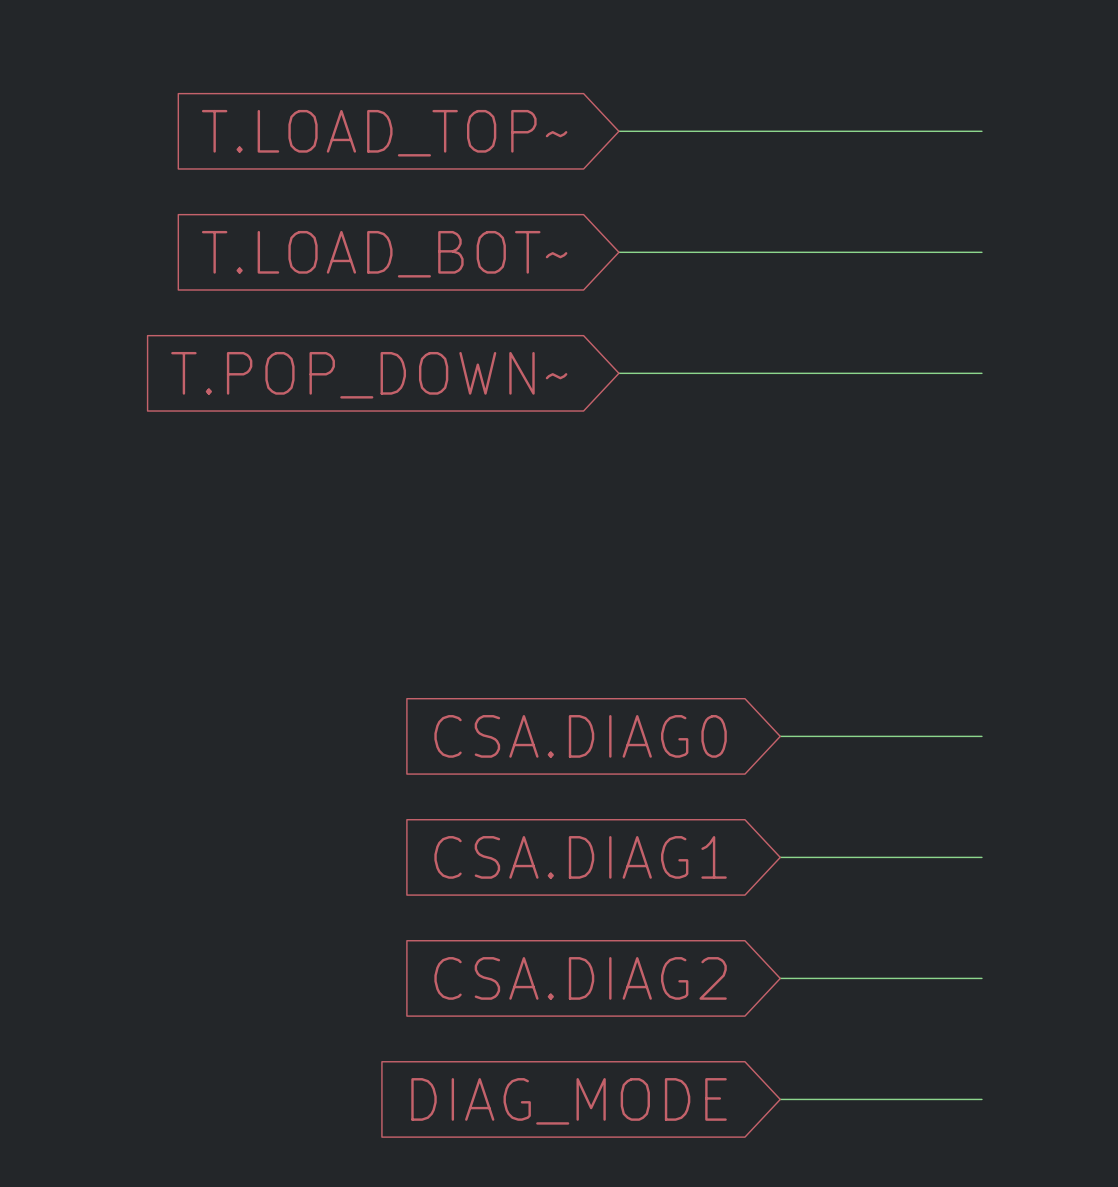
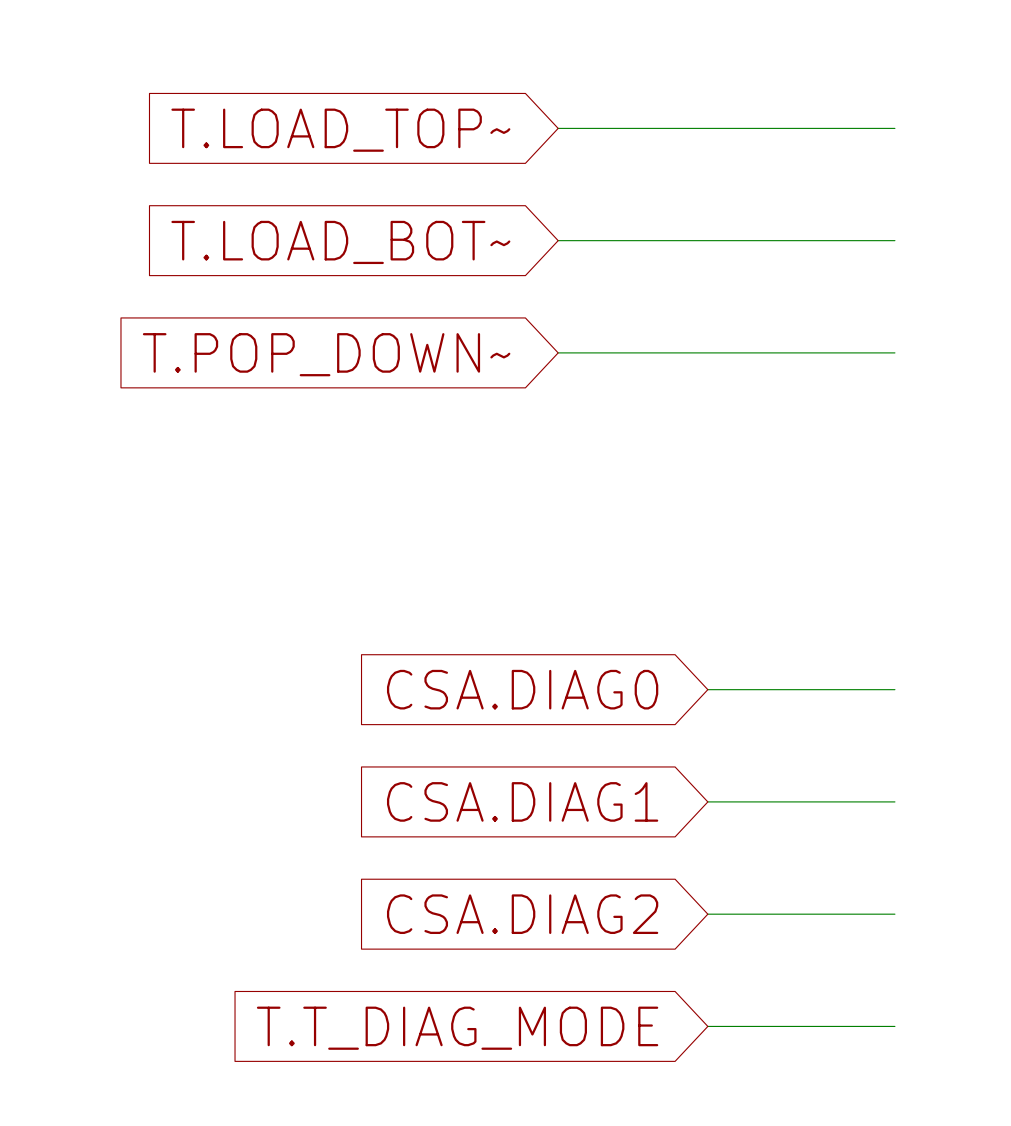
global label: DIAG_MODE (569, 1101) -> T.T_DIAG_MODE (457, 1028)

